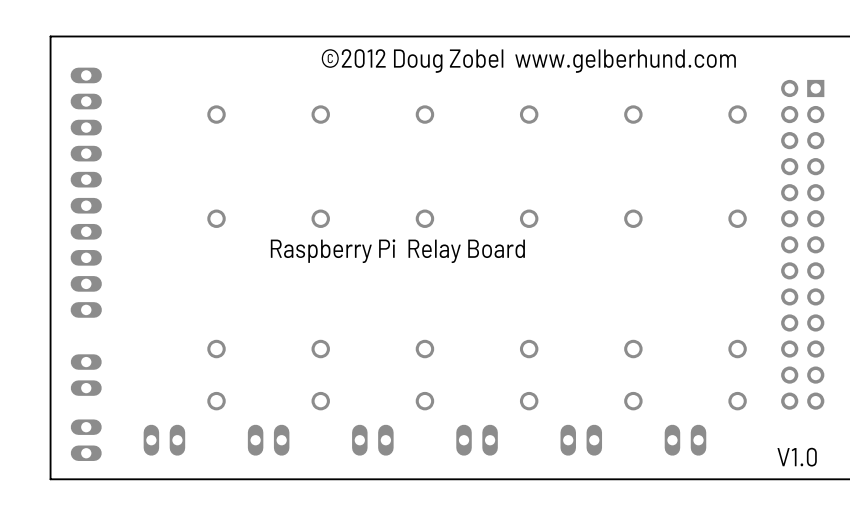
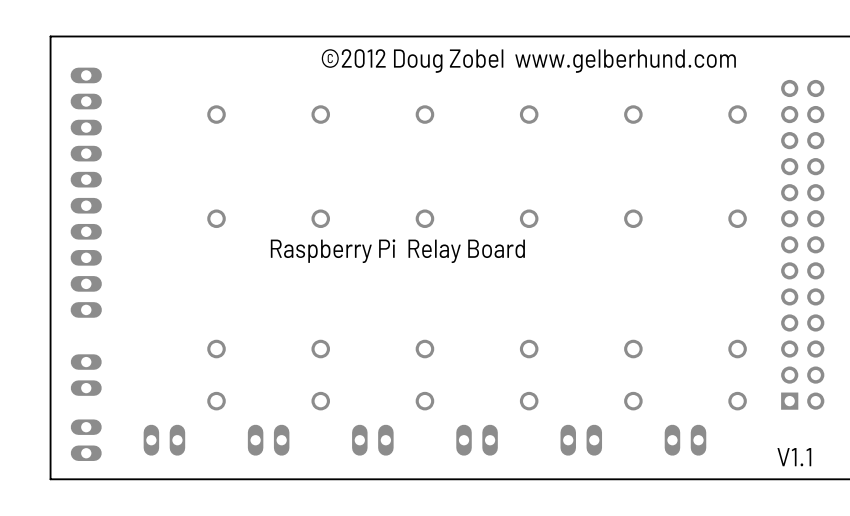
part rotation: 0° (802, 244) -> 180° (802, 244)
text: V1.0 (797, 457) -> V1.1 (794, 457)

